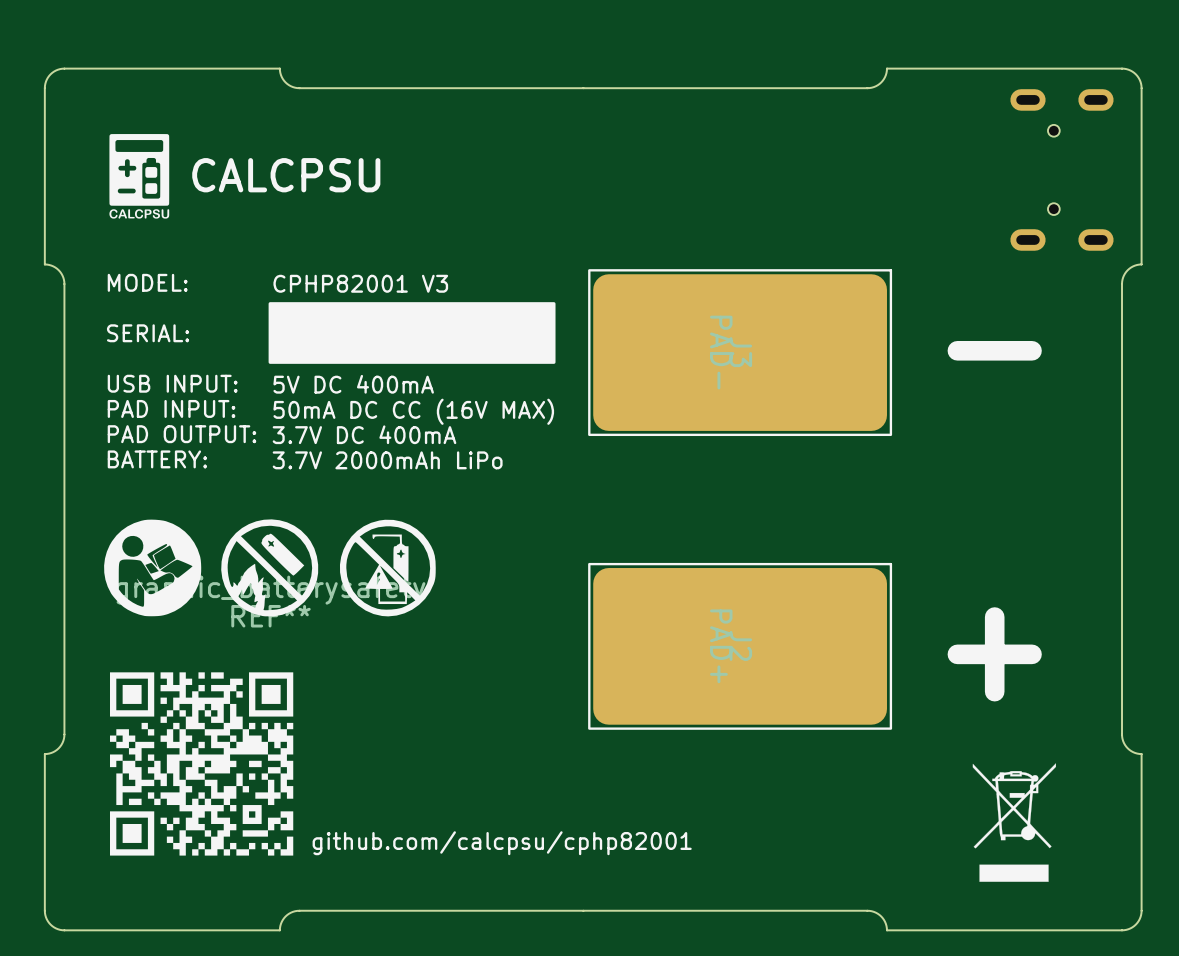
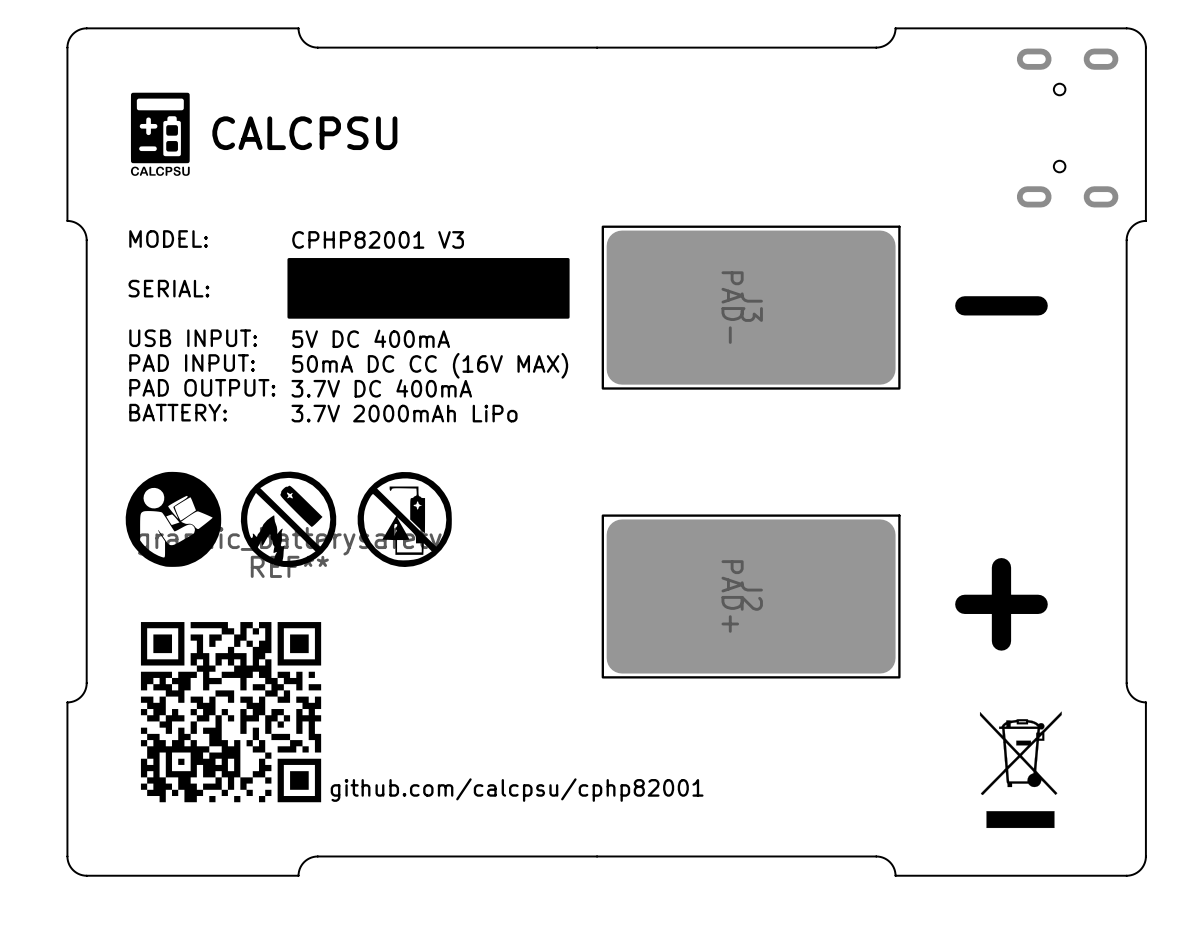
drawing shape: [110, 672, 294, 856] -> [140, 622, 322, 803]

